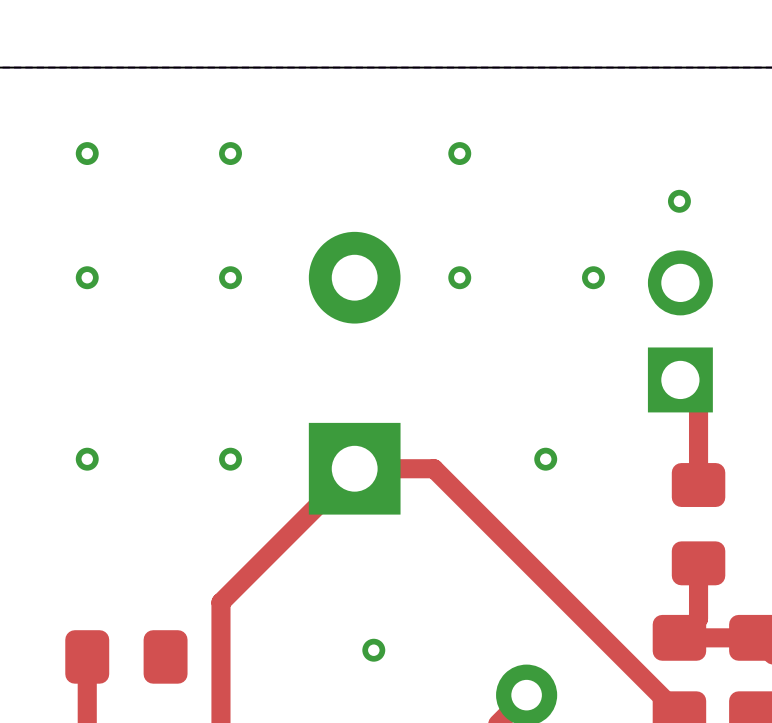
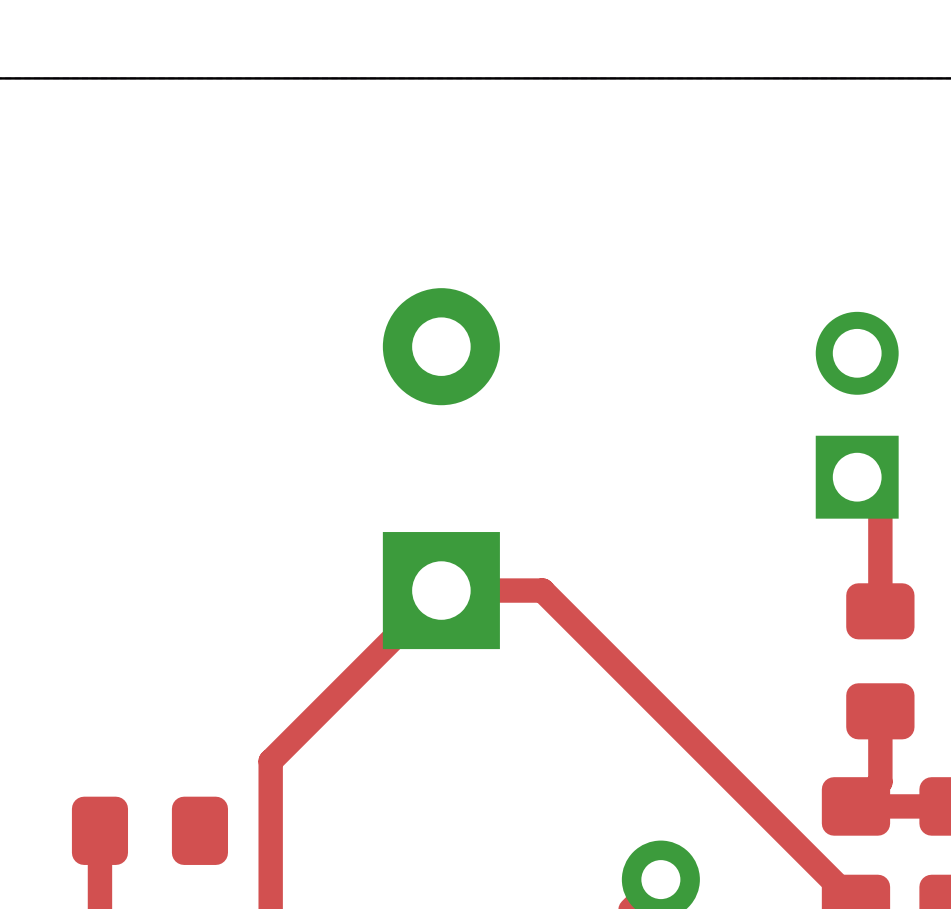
via: (87, 153) -> none
via: (230, 153) -> none
via: (459, 153) -> none
via: (679, 201) -> none
via: (87, 277) -> none
via: (230, 277) -> none
via: (459, 277) -> none
via: (593, 277) -> none
via: (87, 459) -> none
via: (230, 459) -> none
via: (545, 459) -> none
via: (373, 650) -> none

